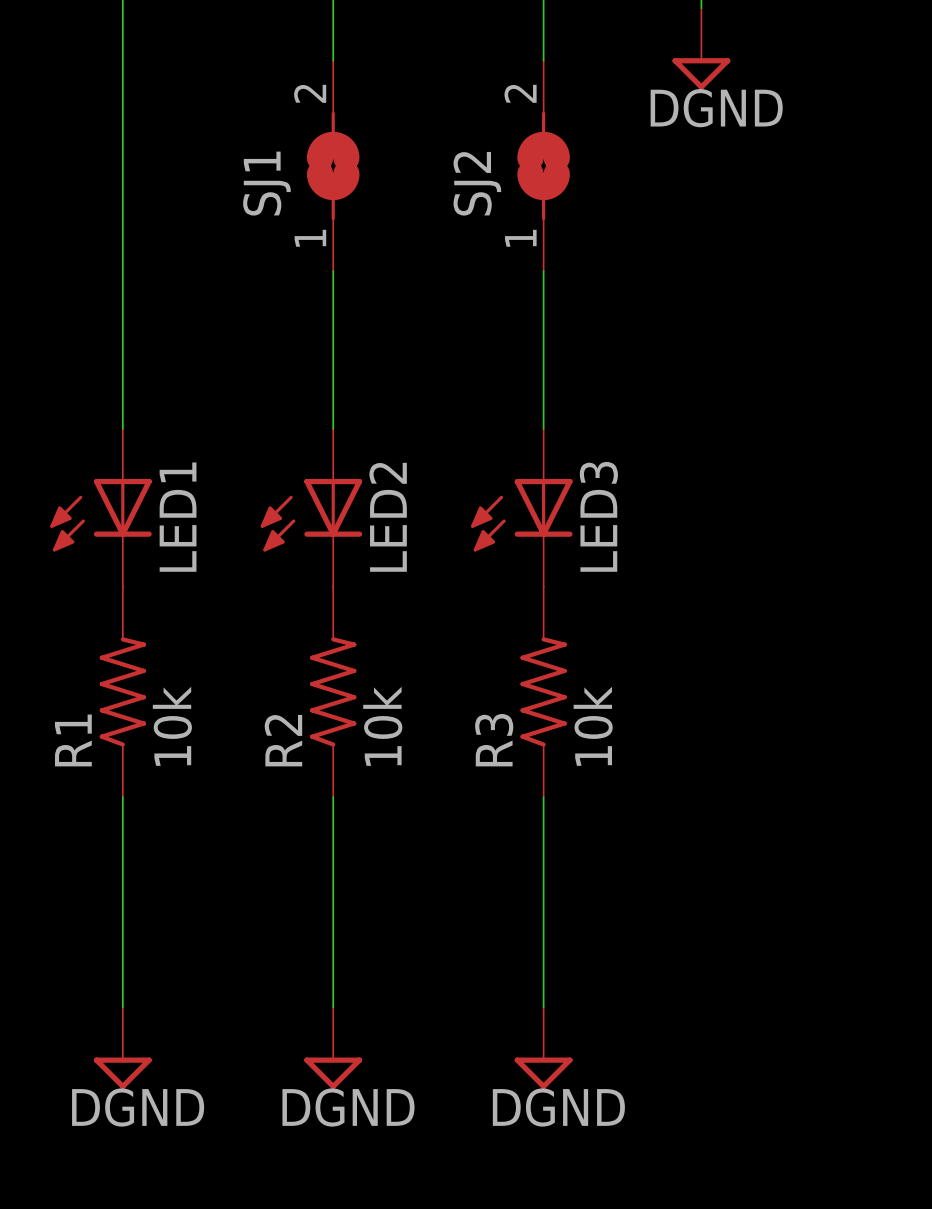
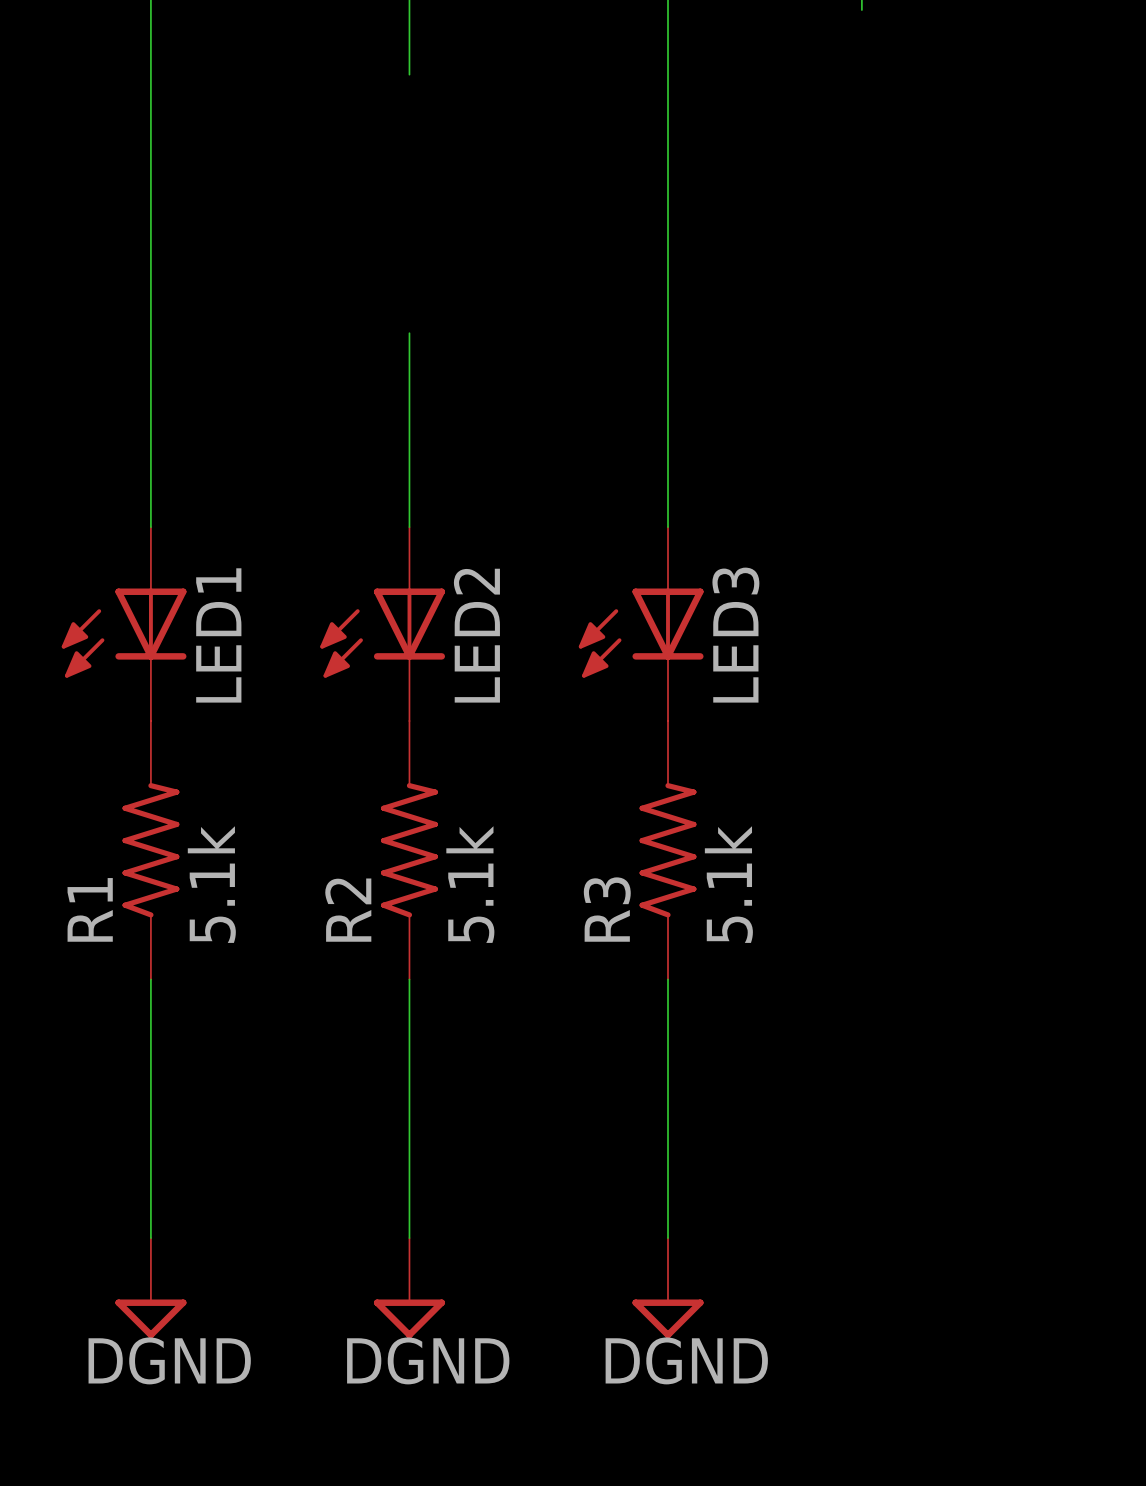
power symbol: DGND (701, 48) -> none
SJ1: (333, 165) -> none
SJ2: (543, 165) -> none
R1 value: 10k (172, 726) -> 5.1k (211, 884)
R2 value: 10k (382, 726) -> 5.1k (470, 884)
R3 value: 10k (593, 726) -> 5.1k (728, 884)

